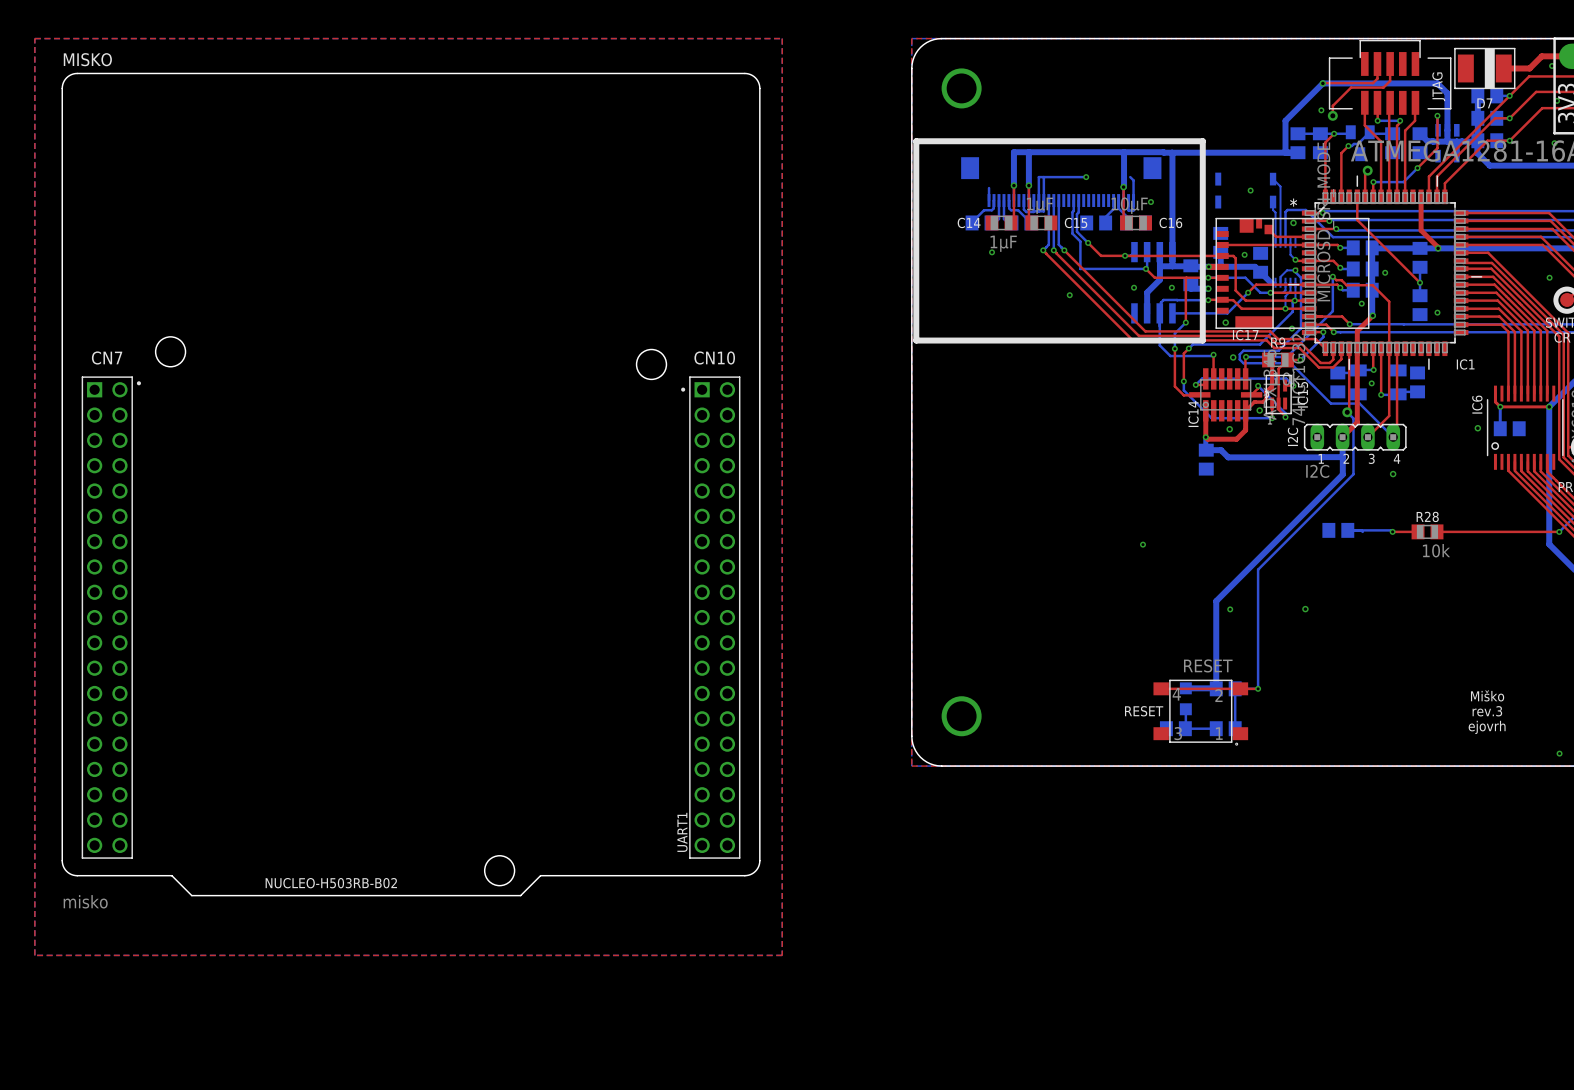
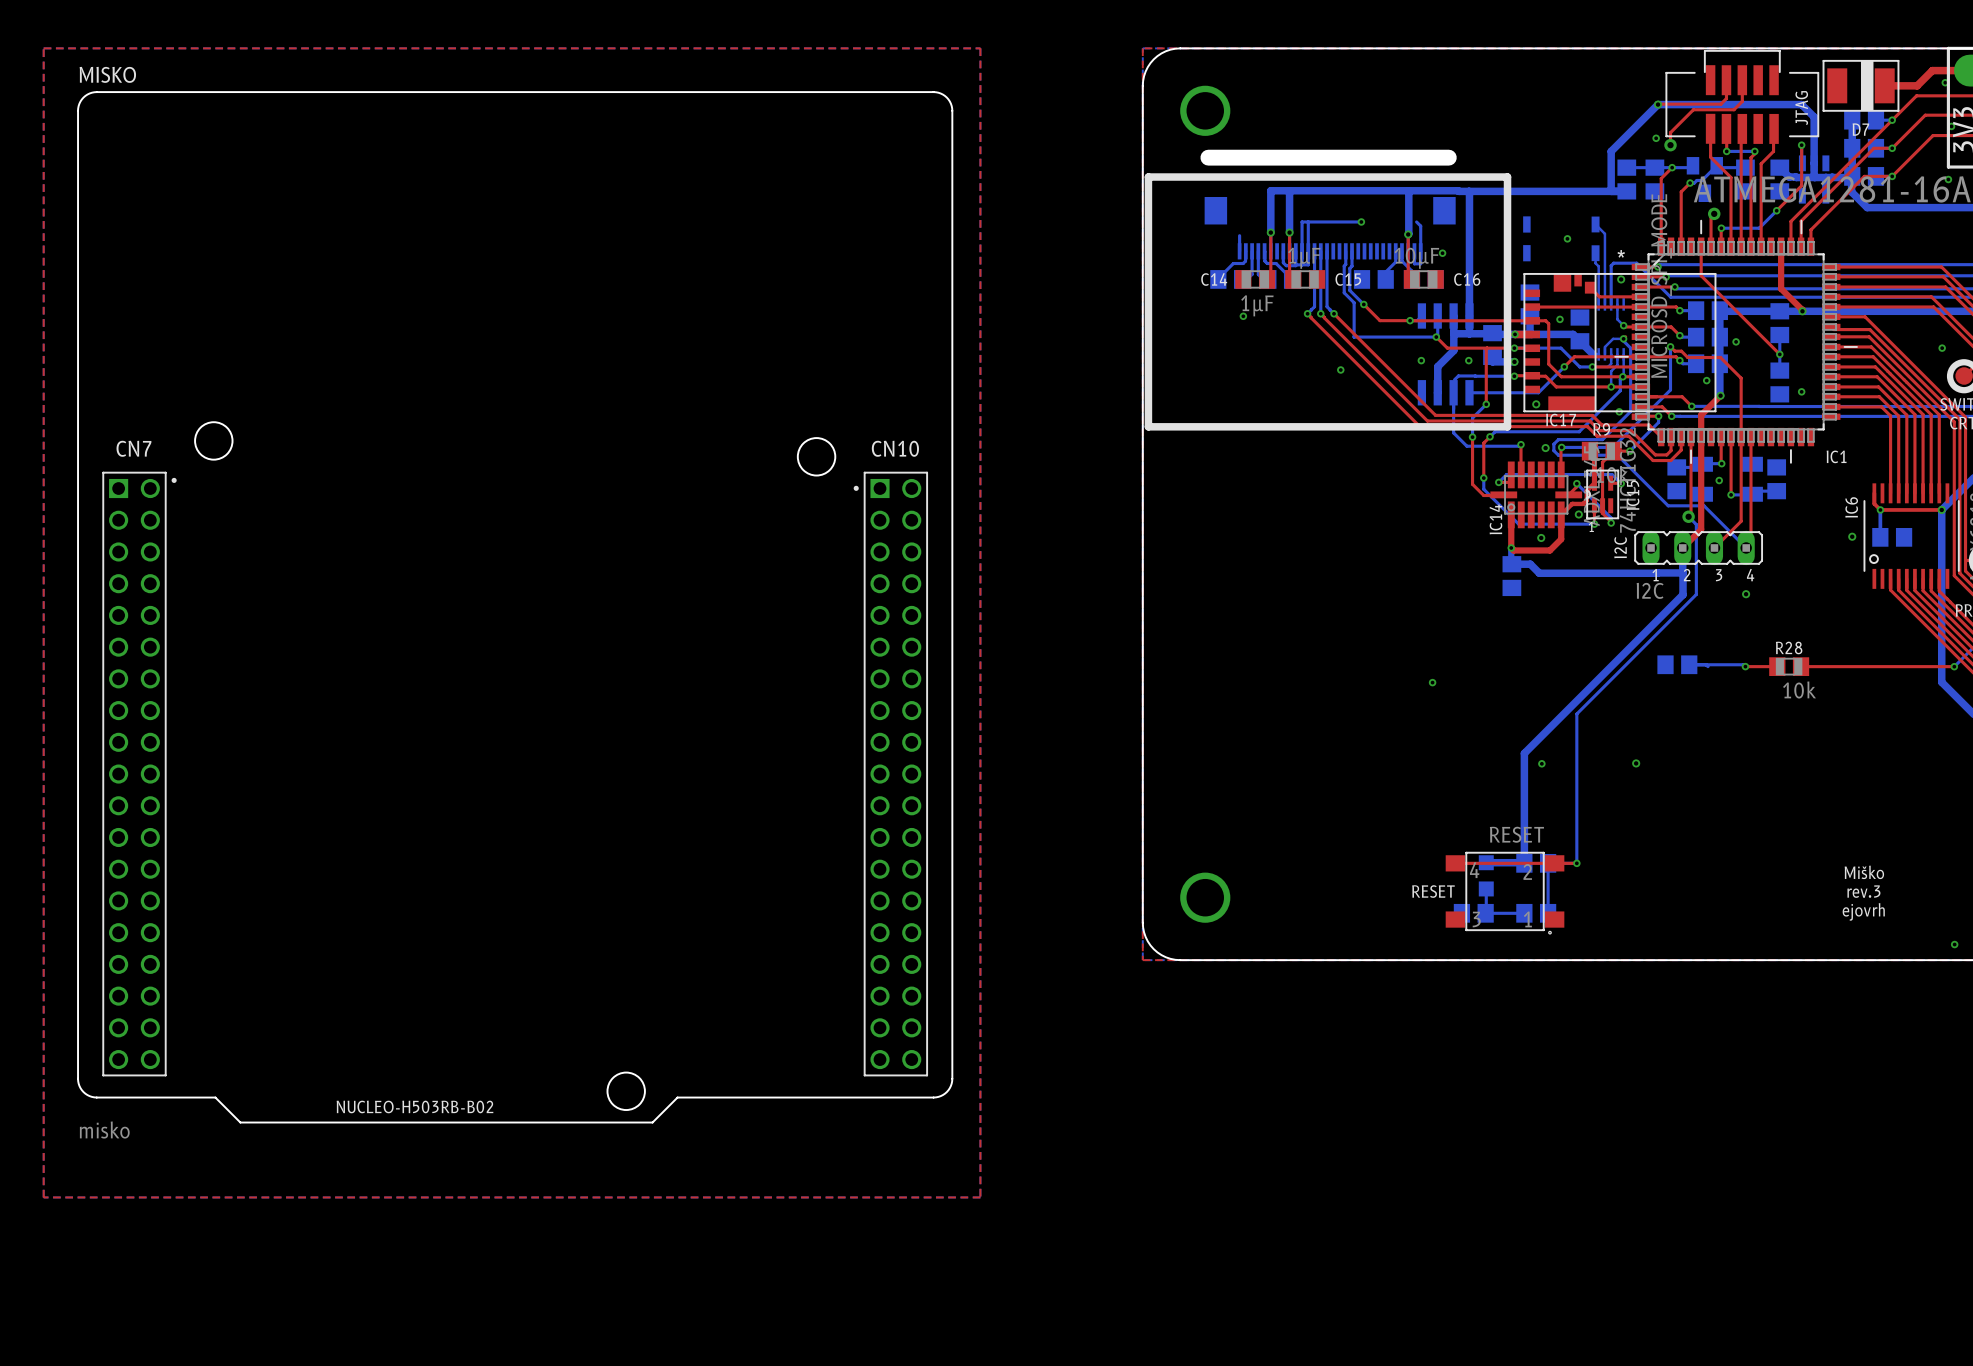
board edge: none -> (1208, 157) (1448, 157)
text: UART1 (682, 832) -> none

